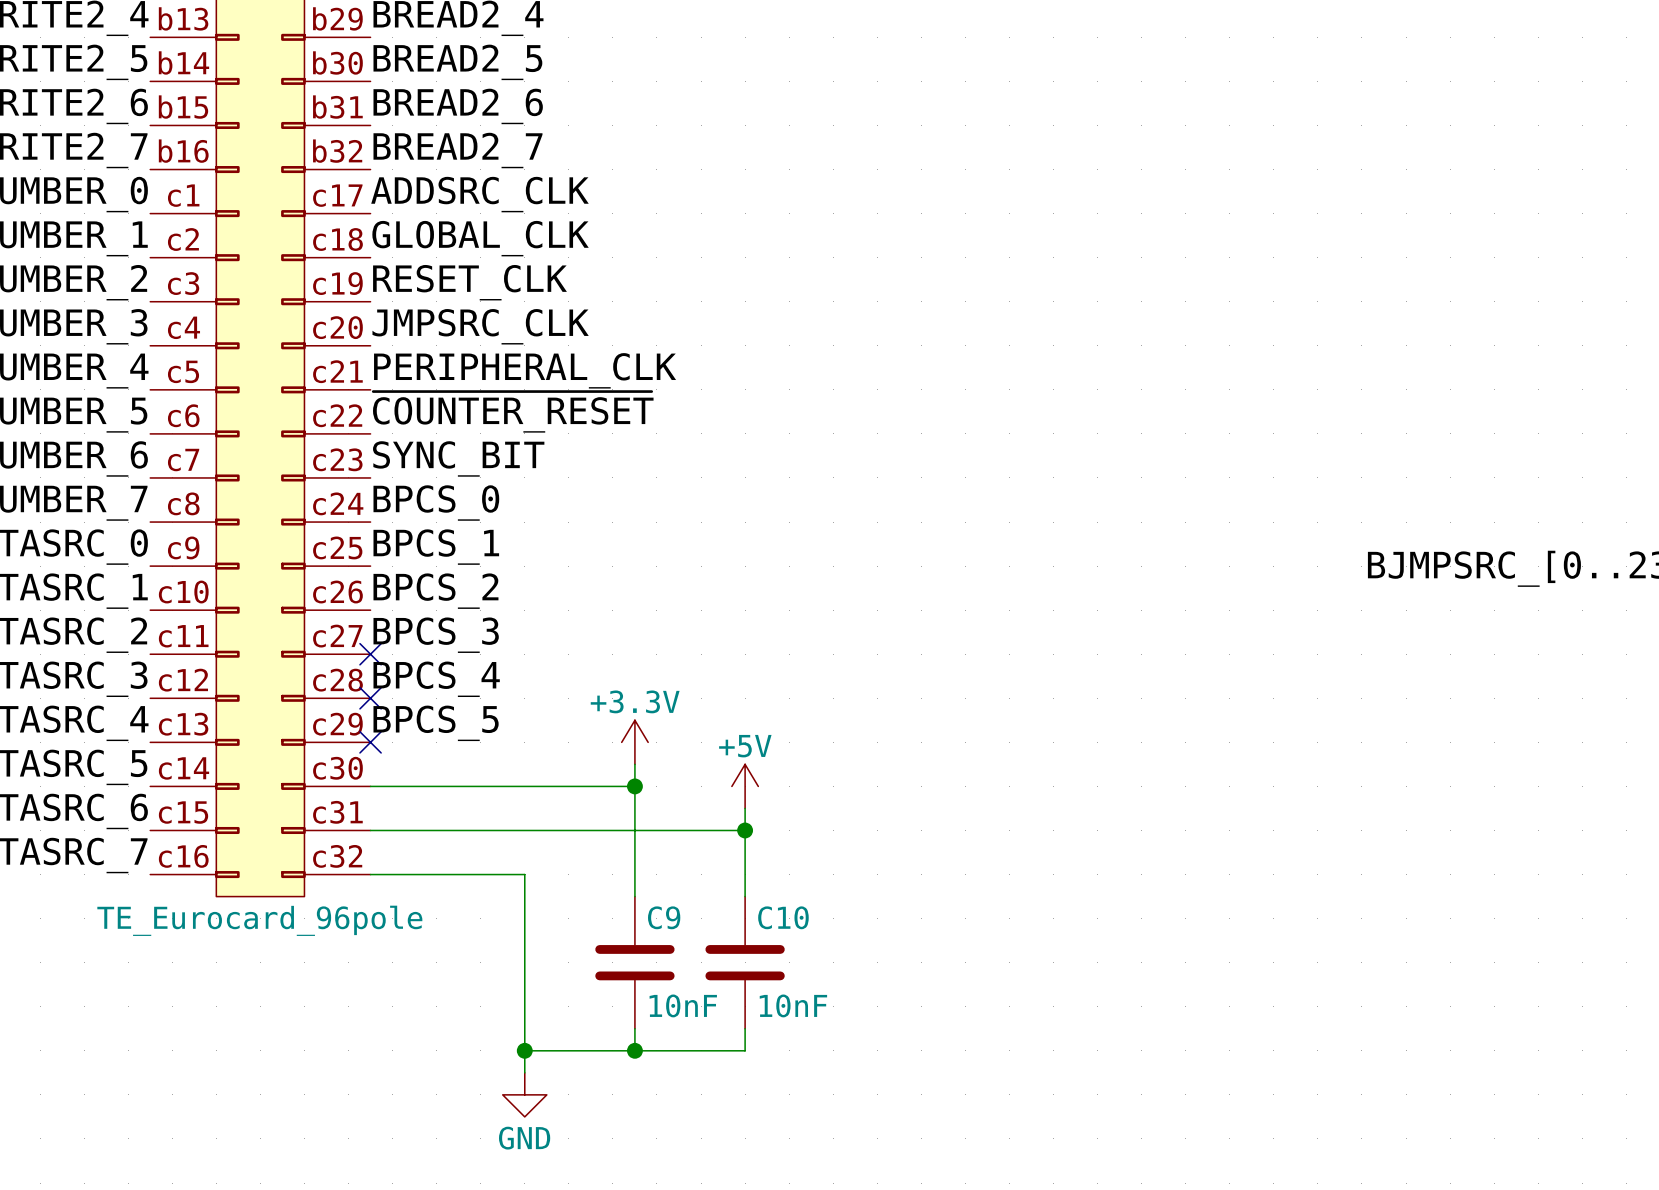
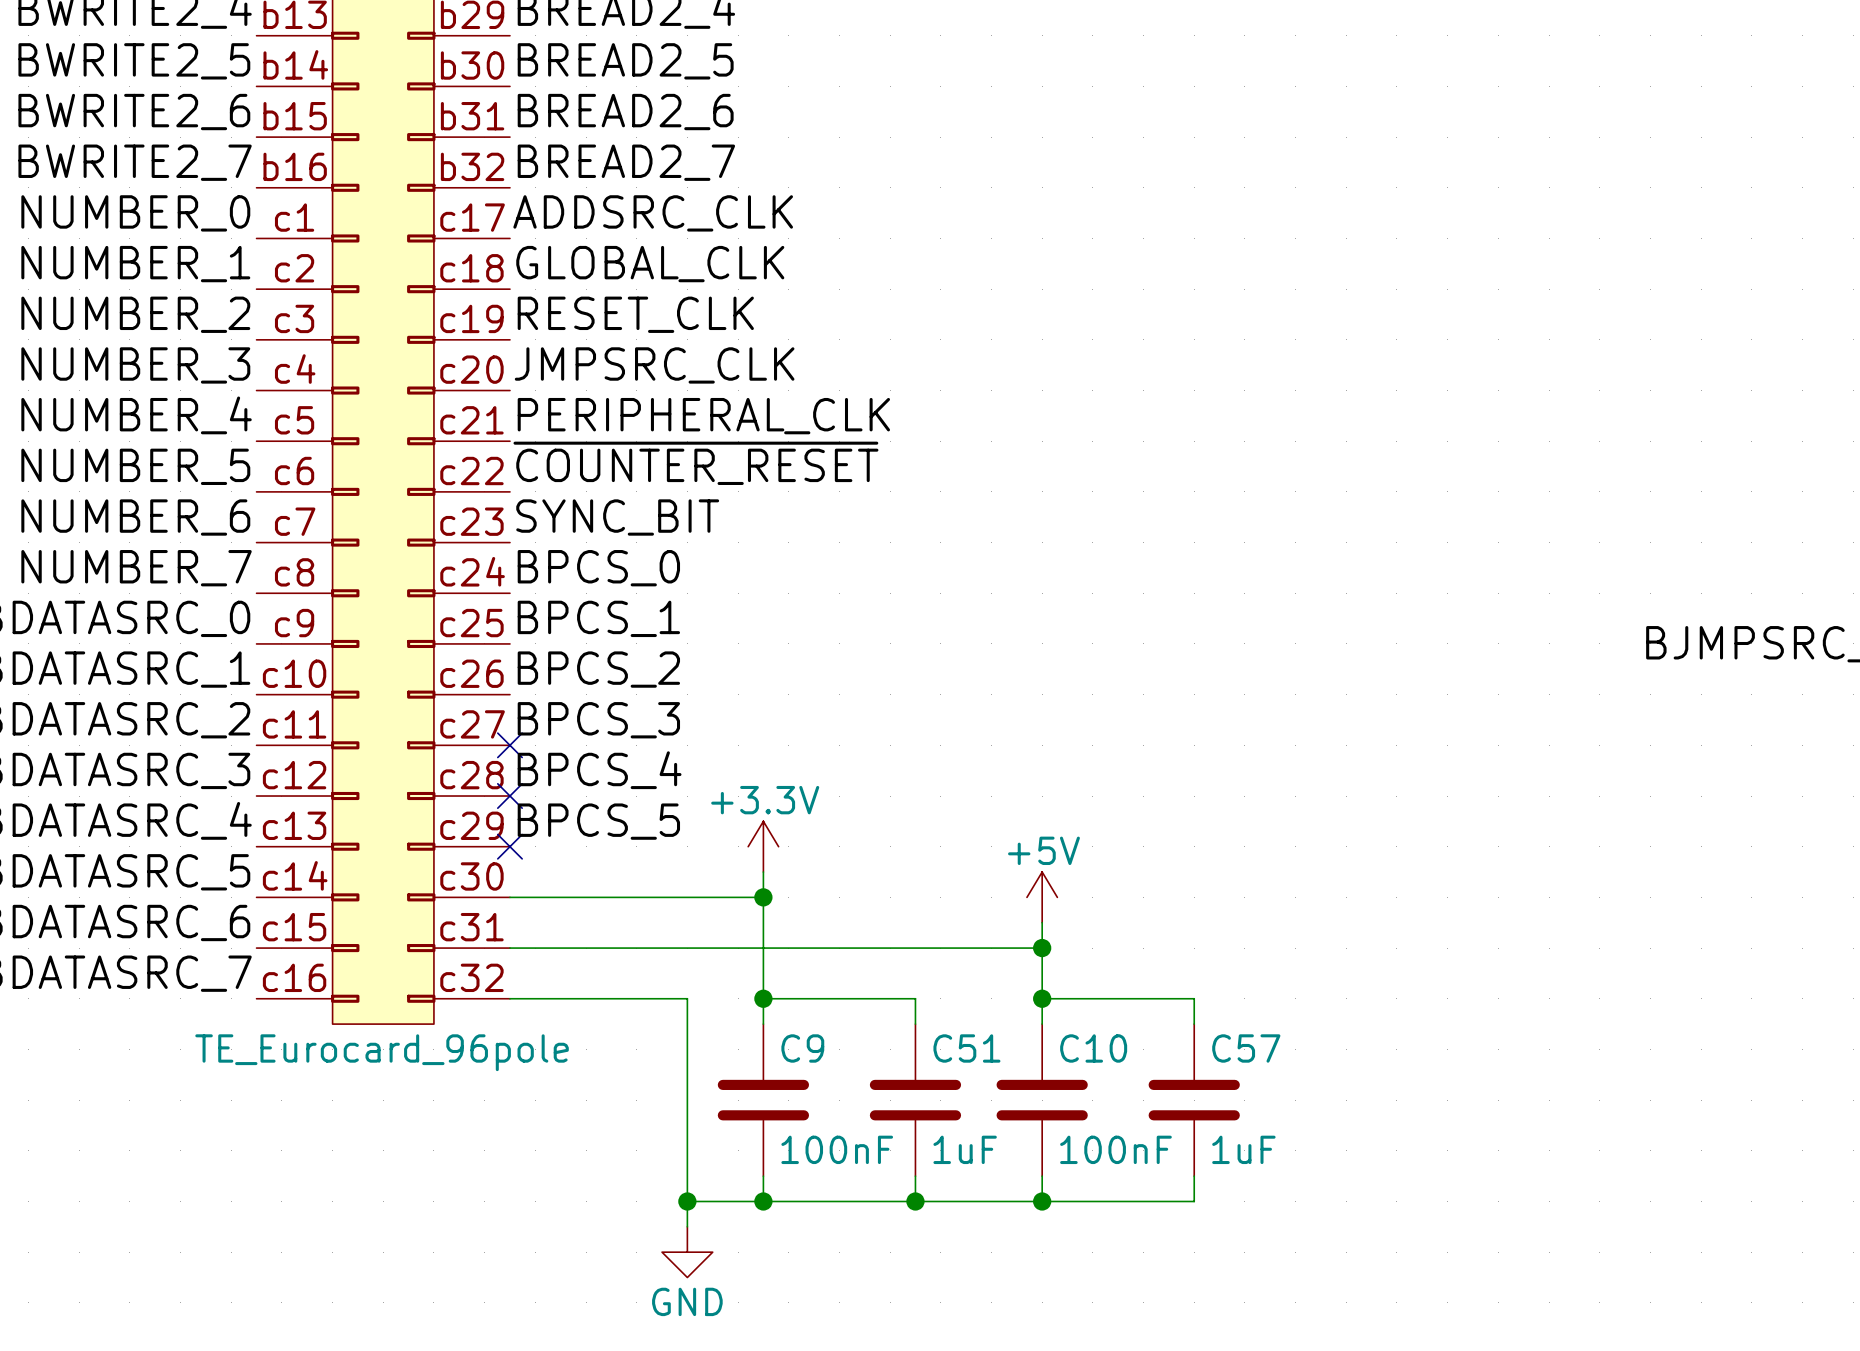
power symbol position: +3.3V (634, 742) -> +3.3V (763, 846)
wire: (634, 764) (634, 896) -> (763, 872) (763, 1024)
wire: (590, 786) (634, 786) -> none
junction position: (634, 786) -> (763, 897)
power symbol position: +5V (745, 786) -> +5V (1042, 897)
wire: (745, 808) (745, 896) -> (1042, 922) (1042, 1024)
wire: none -> (940, 948) (1042, 948)
junction: (745, 830) -> none
junction: none -> (1042, 948)
wire: none -> (763, 998) (915, 998) (915, 1024)
junction: none -> (763, 998)
wire: none -> (1042, 998) (1194, 998) (1194, 1024)
junction: none -> (1042, 998)
C9 position: (634, 962) -> (763, 1100)
C51: none -> 1uF (915, 1100)
C10 position: (745, 962) -> (1042, 1100)
C57: none -> 1uF (1194, 1100)
C9 value: 10nF (683, 1005) -> 100nF (837, 1149)
C10 value: 10nF (793, 1005) -> 100nF (1115, 1149)
wire: none -> (763, 1176) (763, 1201)
wire: (634, 1028) (634, 1050) -> (915, 1176) (915, 1201)
wire: (745, 1028) (745, 1050) -> (1194, 1176) (1194, 1201) (940, 1201)
wire: none -> (1042, 1176) (1042, 1201)
junction: none -> (763, 1201)
junction: (634, 1050) -> none
junction: none -> (915, 1201)
junction: none -> (1042, 1201)

